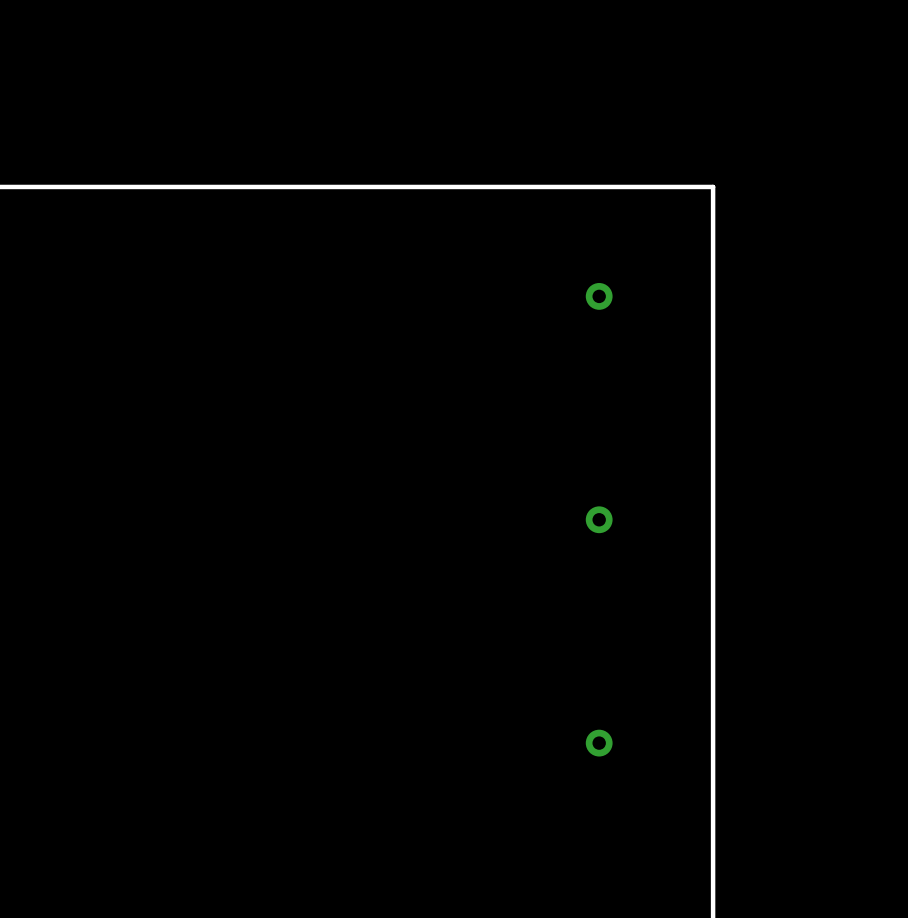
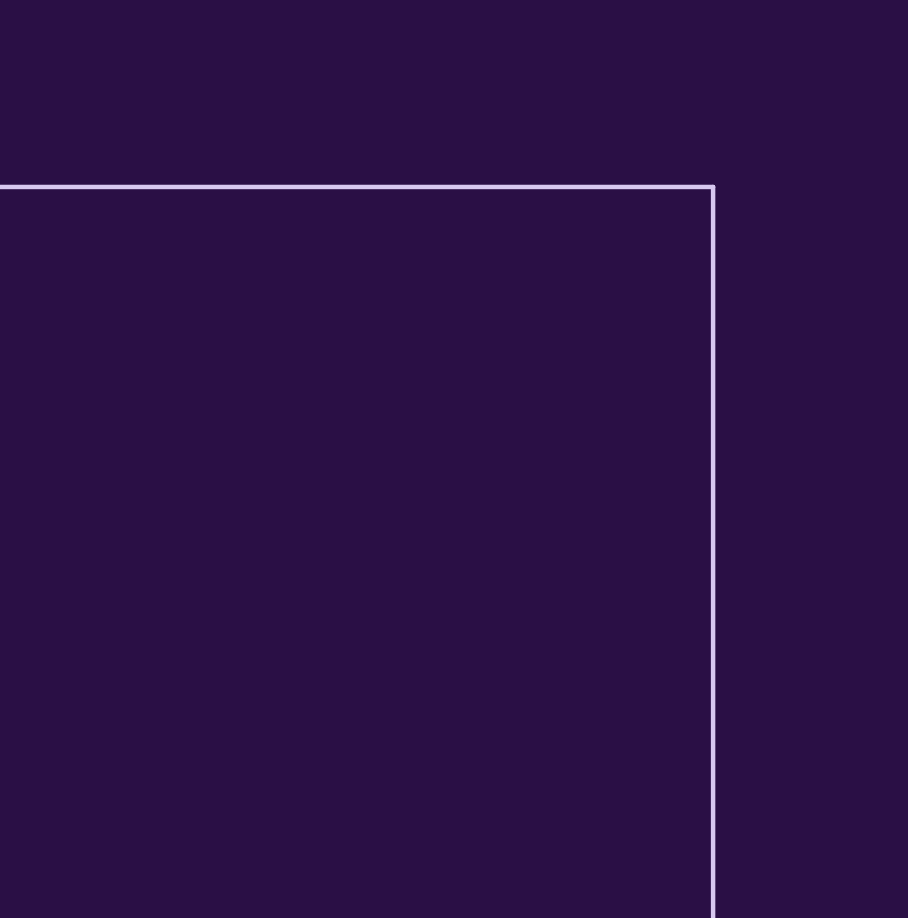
via: (599, 296) -> none
via: (599, 519) -> none
via: (599, 743) -> none

